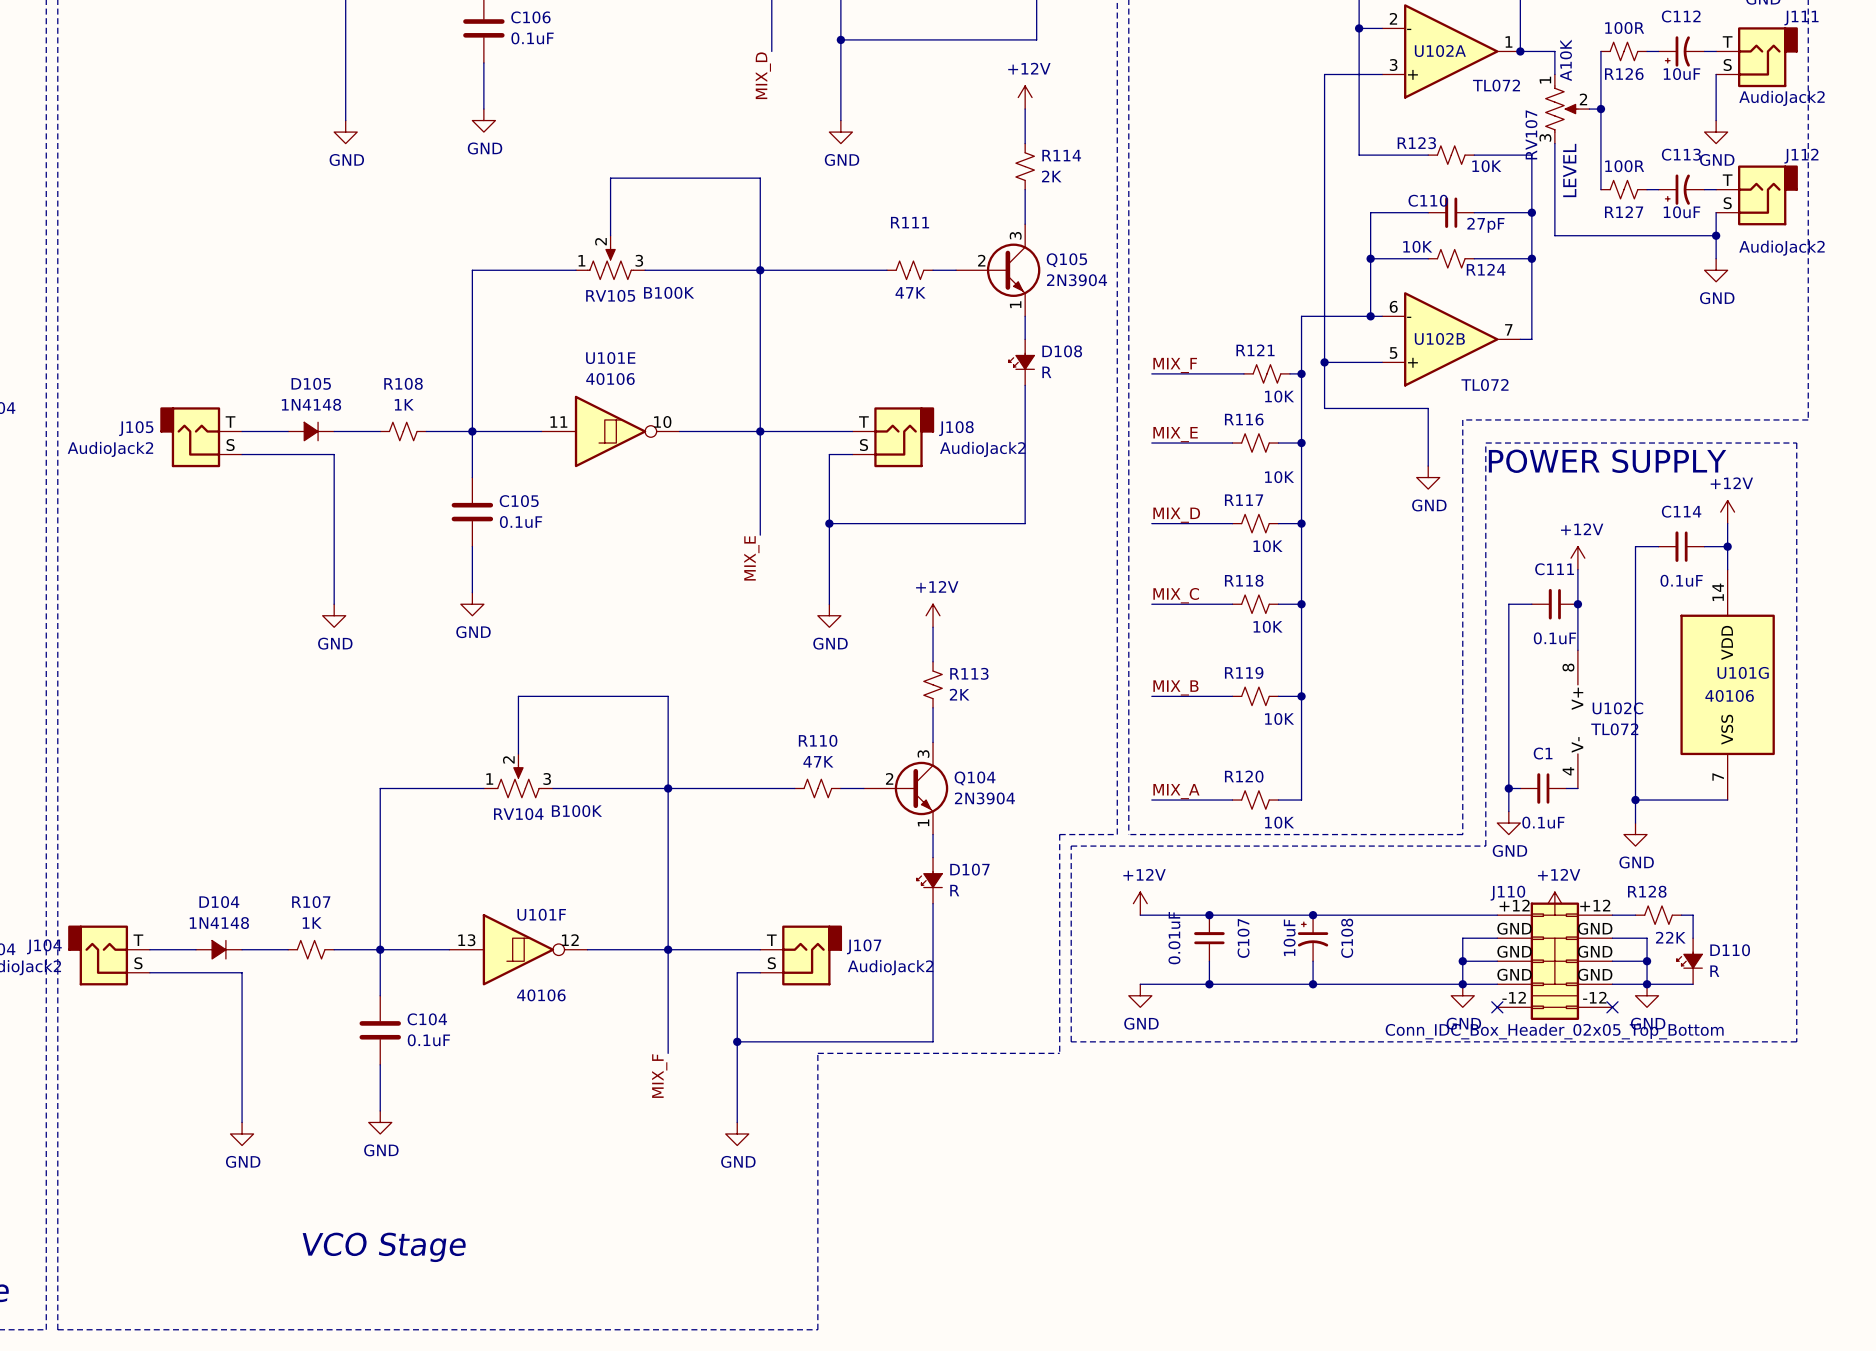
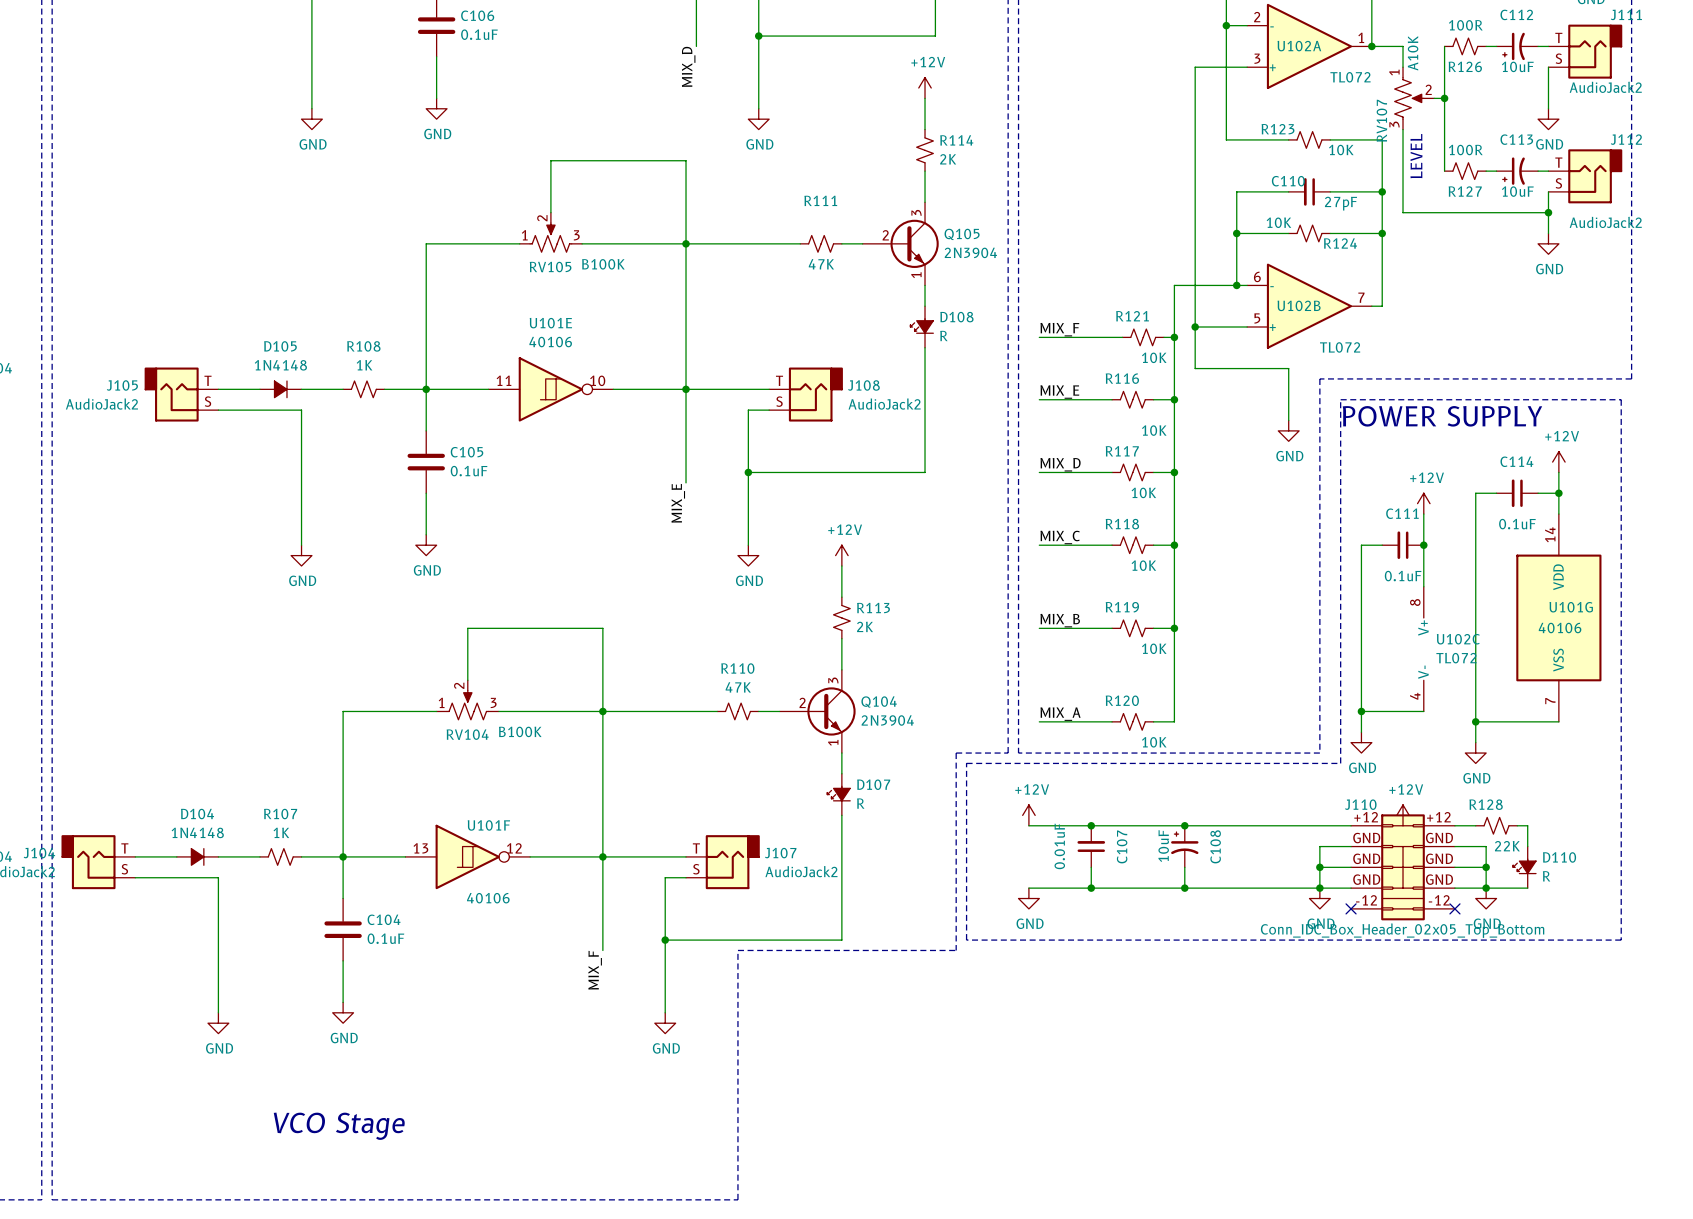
C1: 0.1uF (1543, 788) -> none

